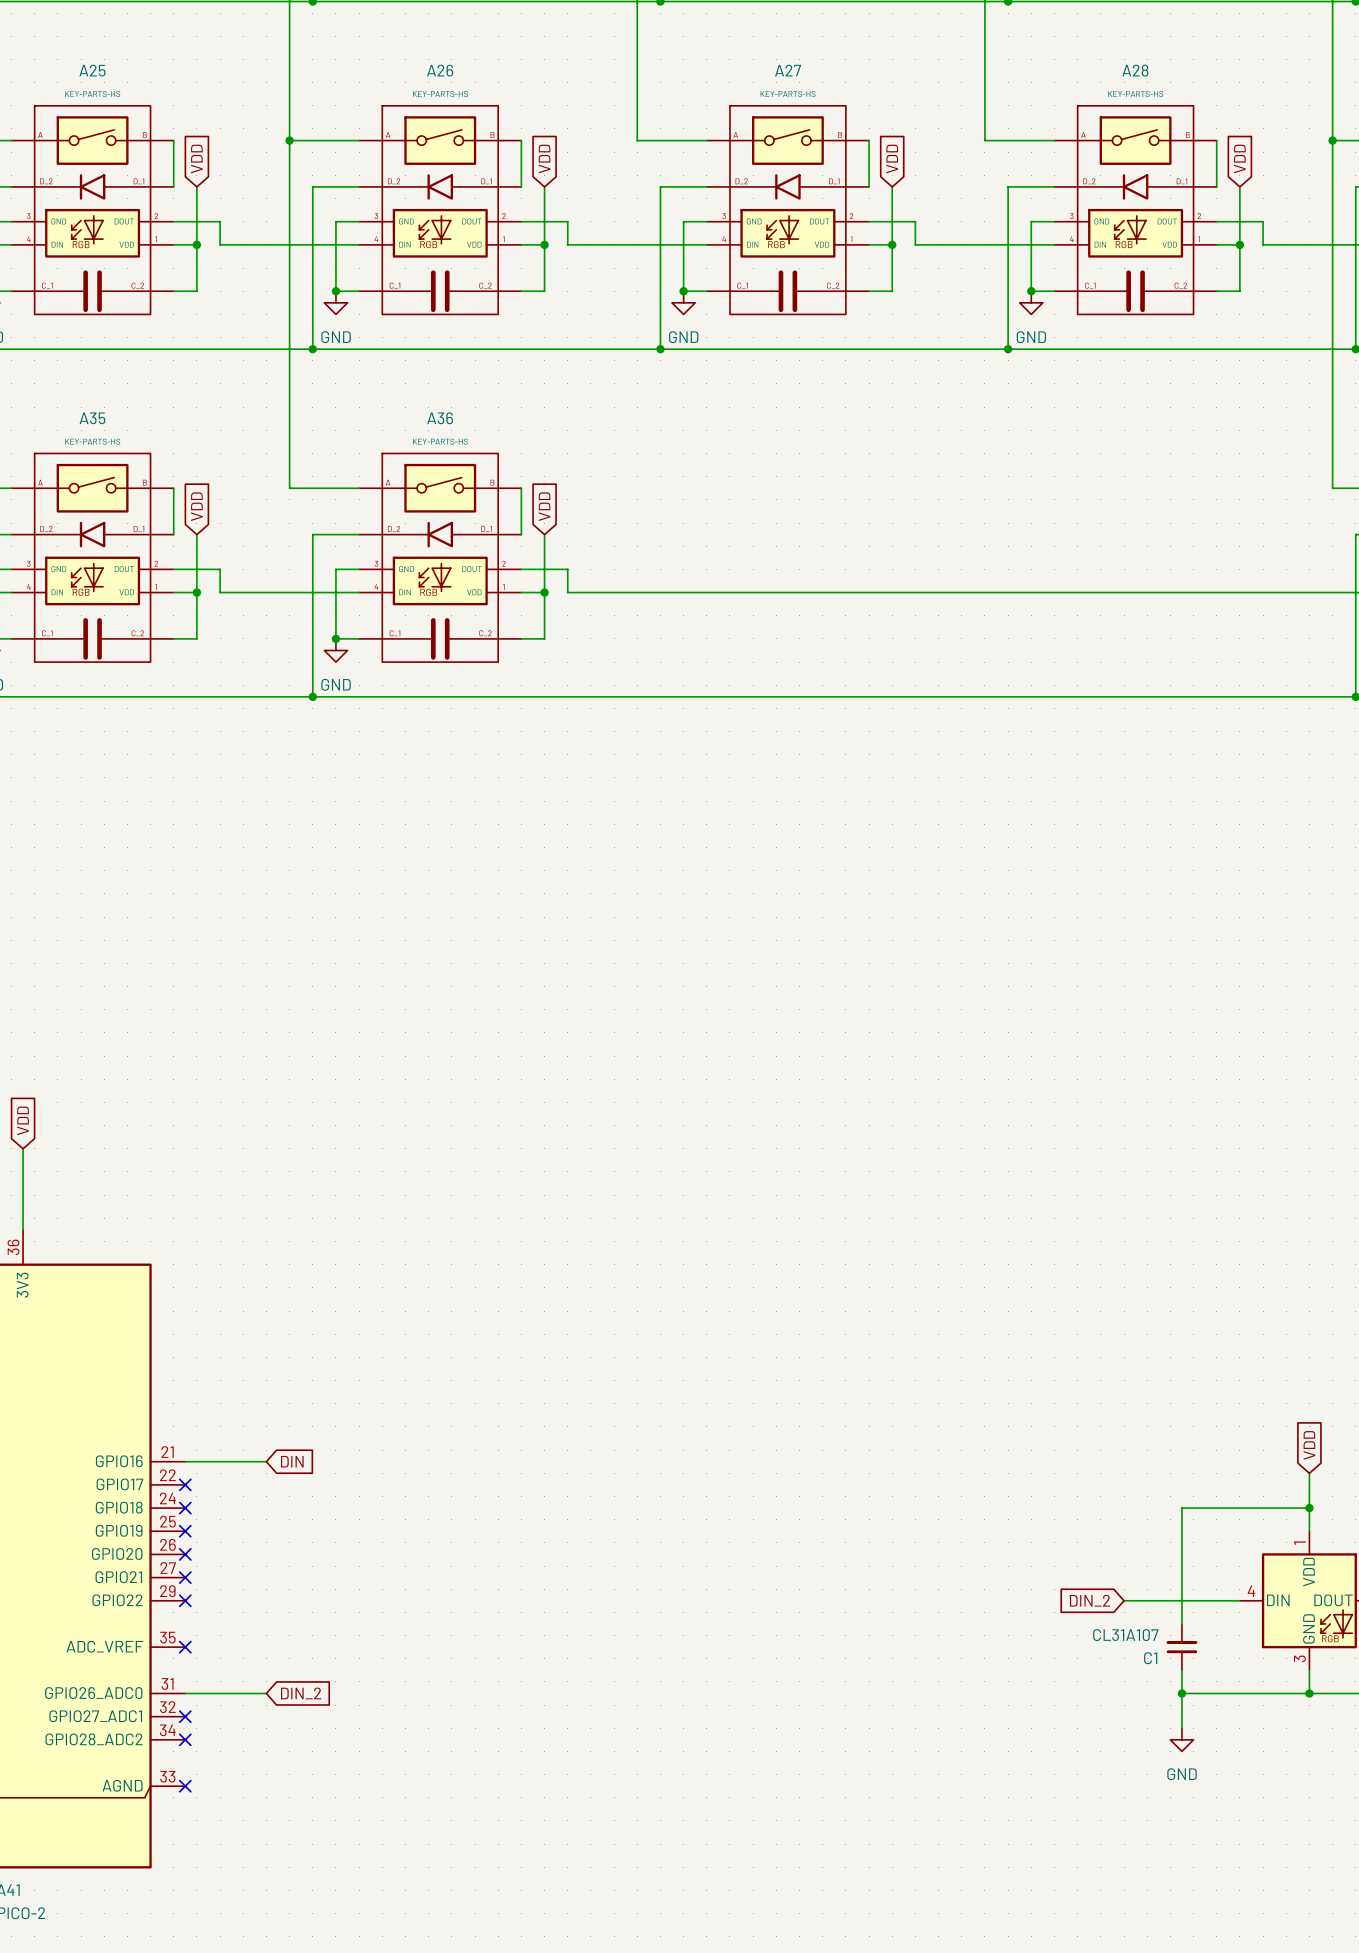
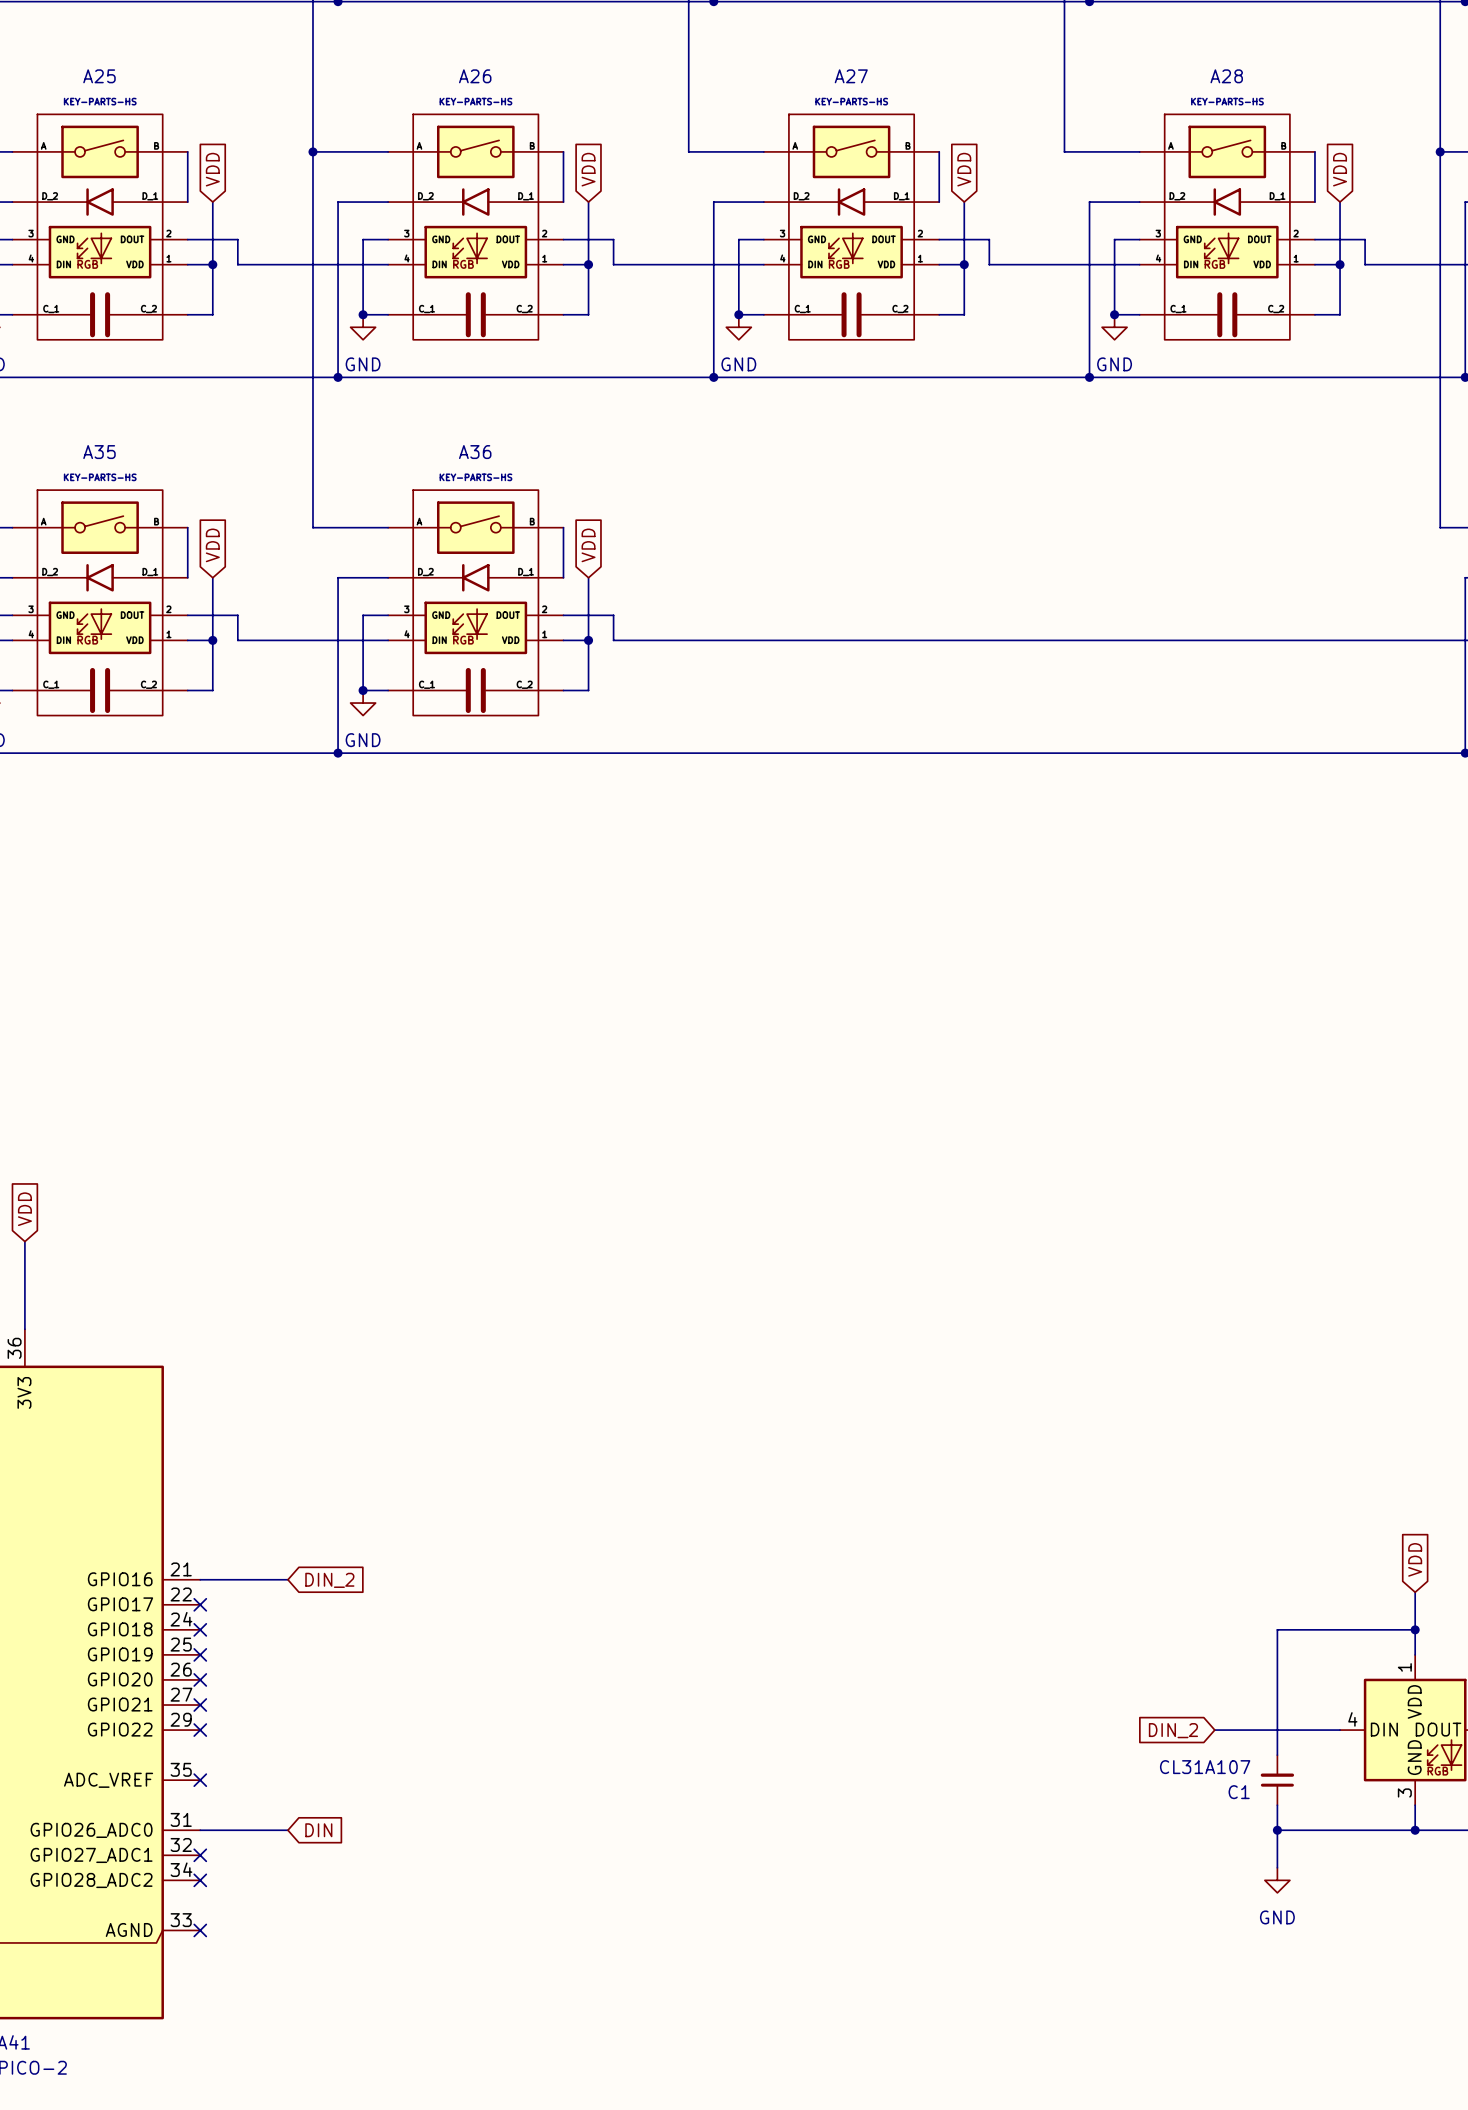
global label: DIN (292, 1461) -> DIN_2 (329, 1580)
global label: DIN_2 (301, 1693) -> DIN (318, 1830)

